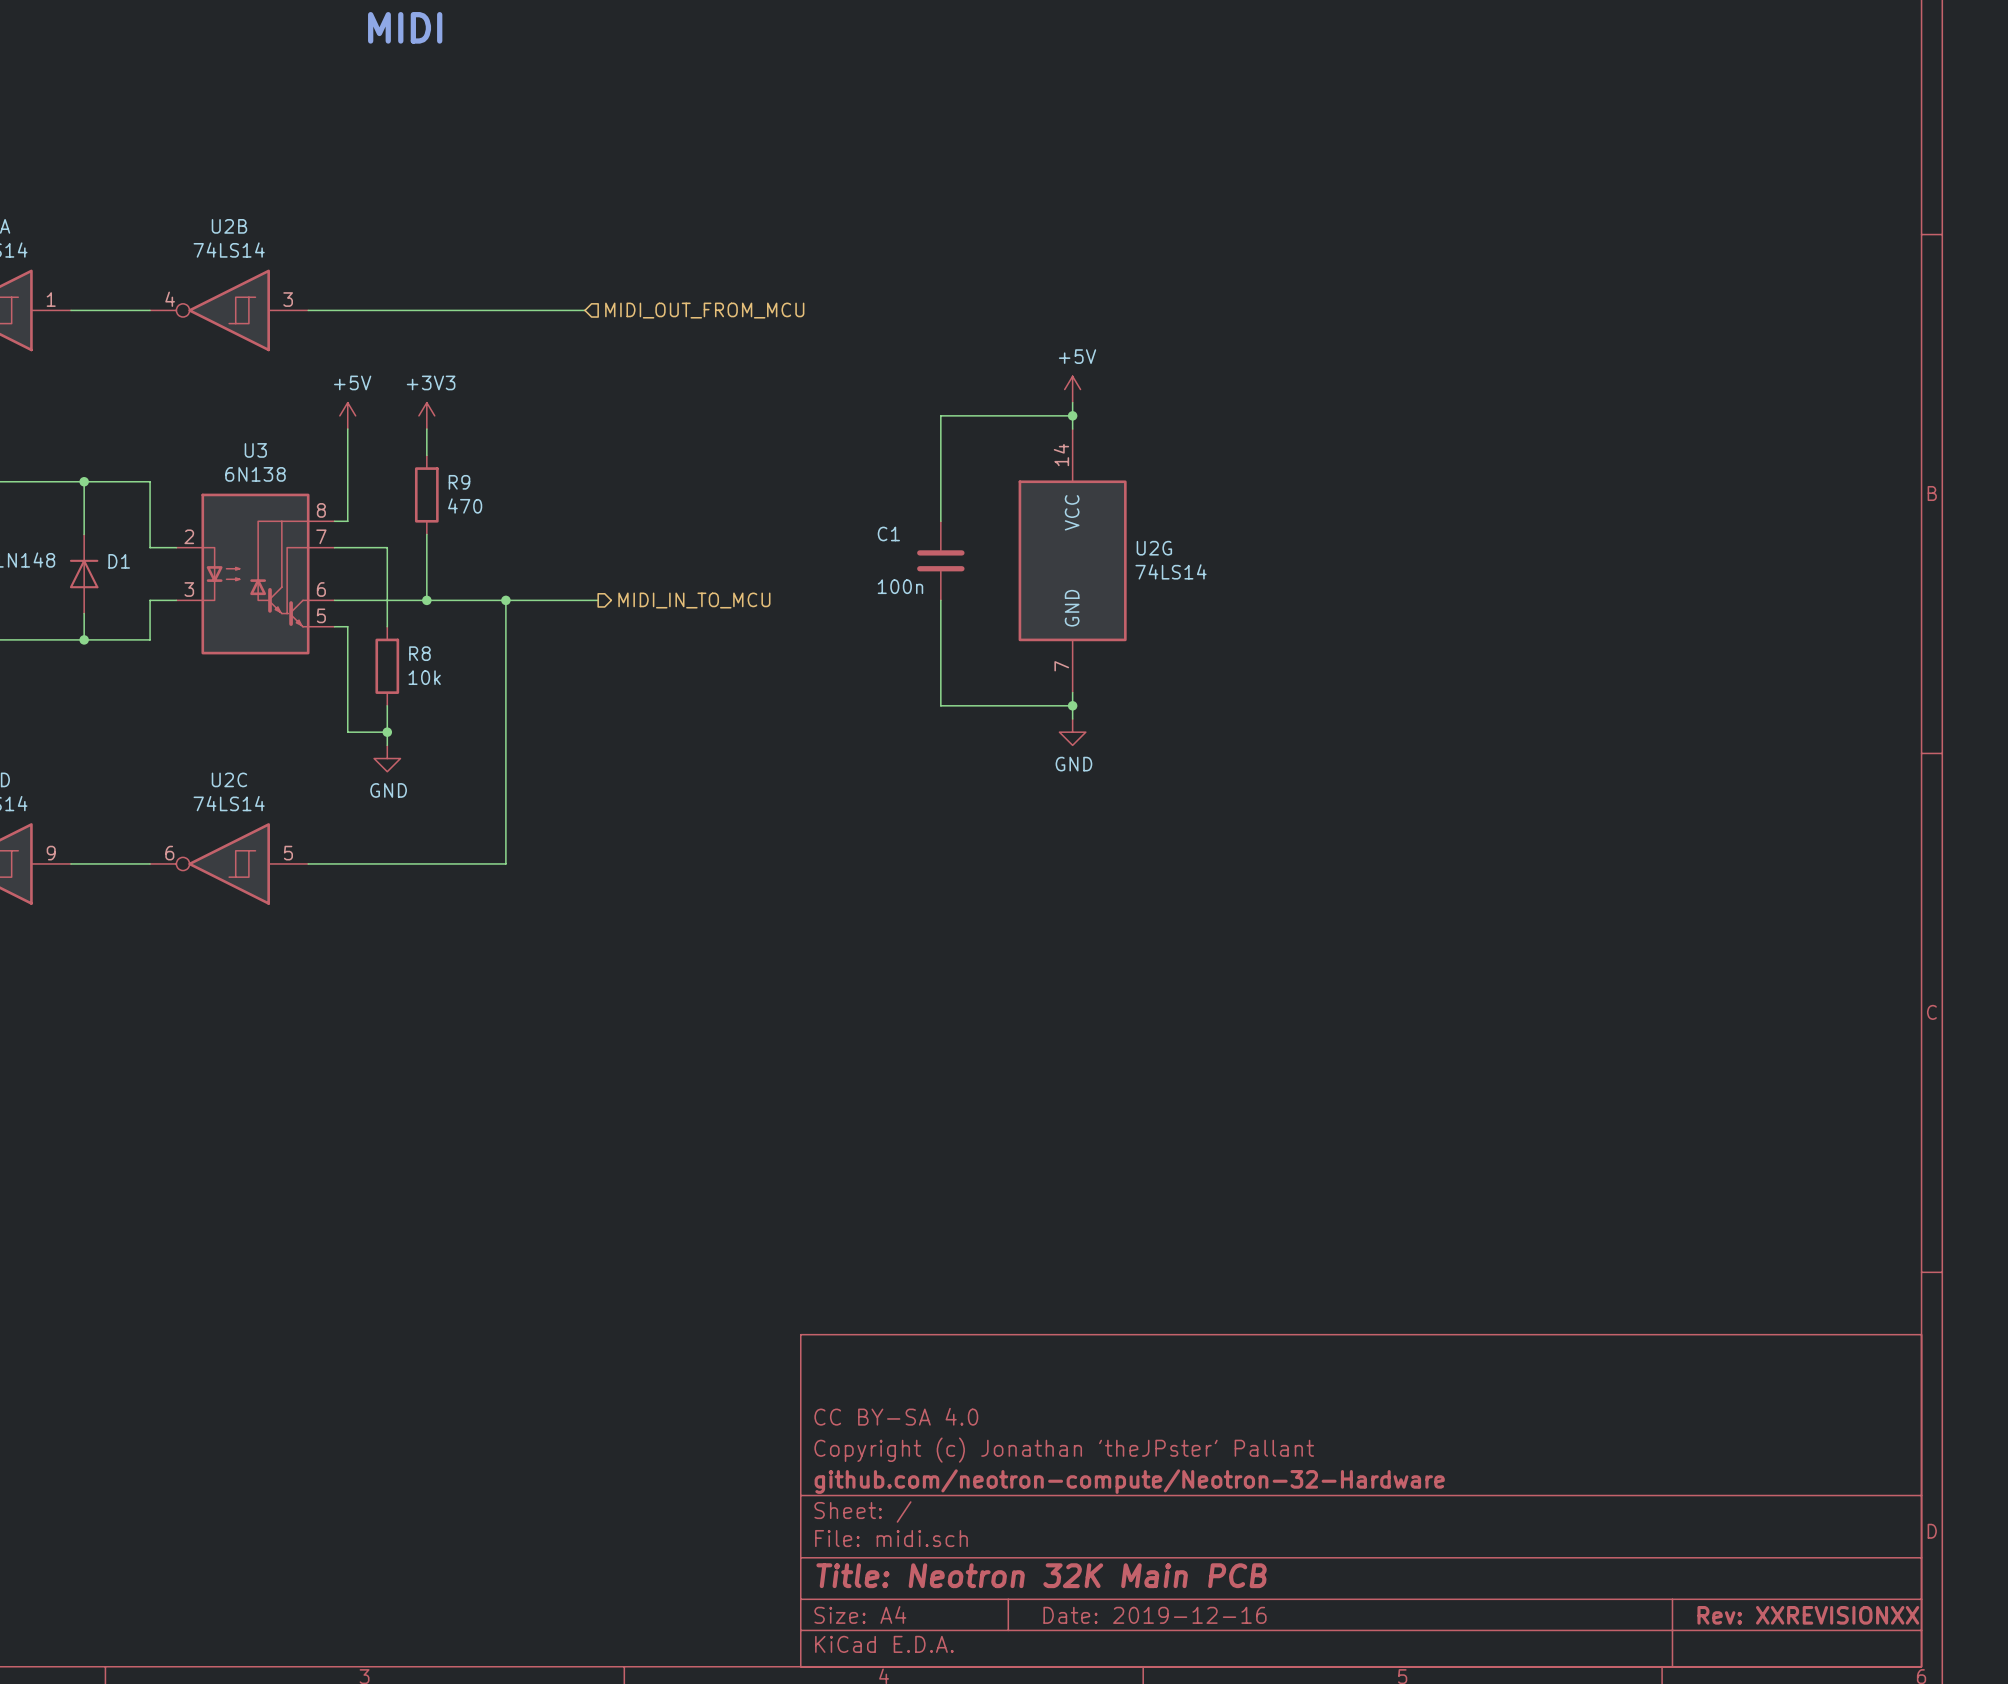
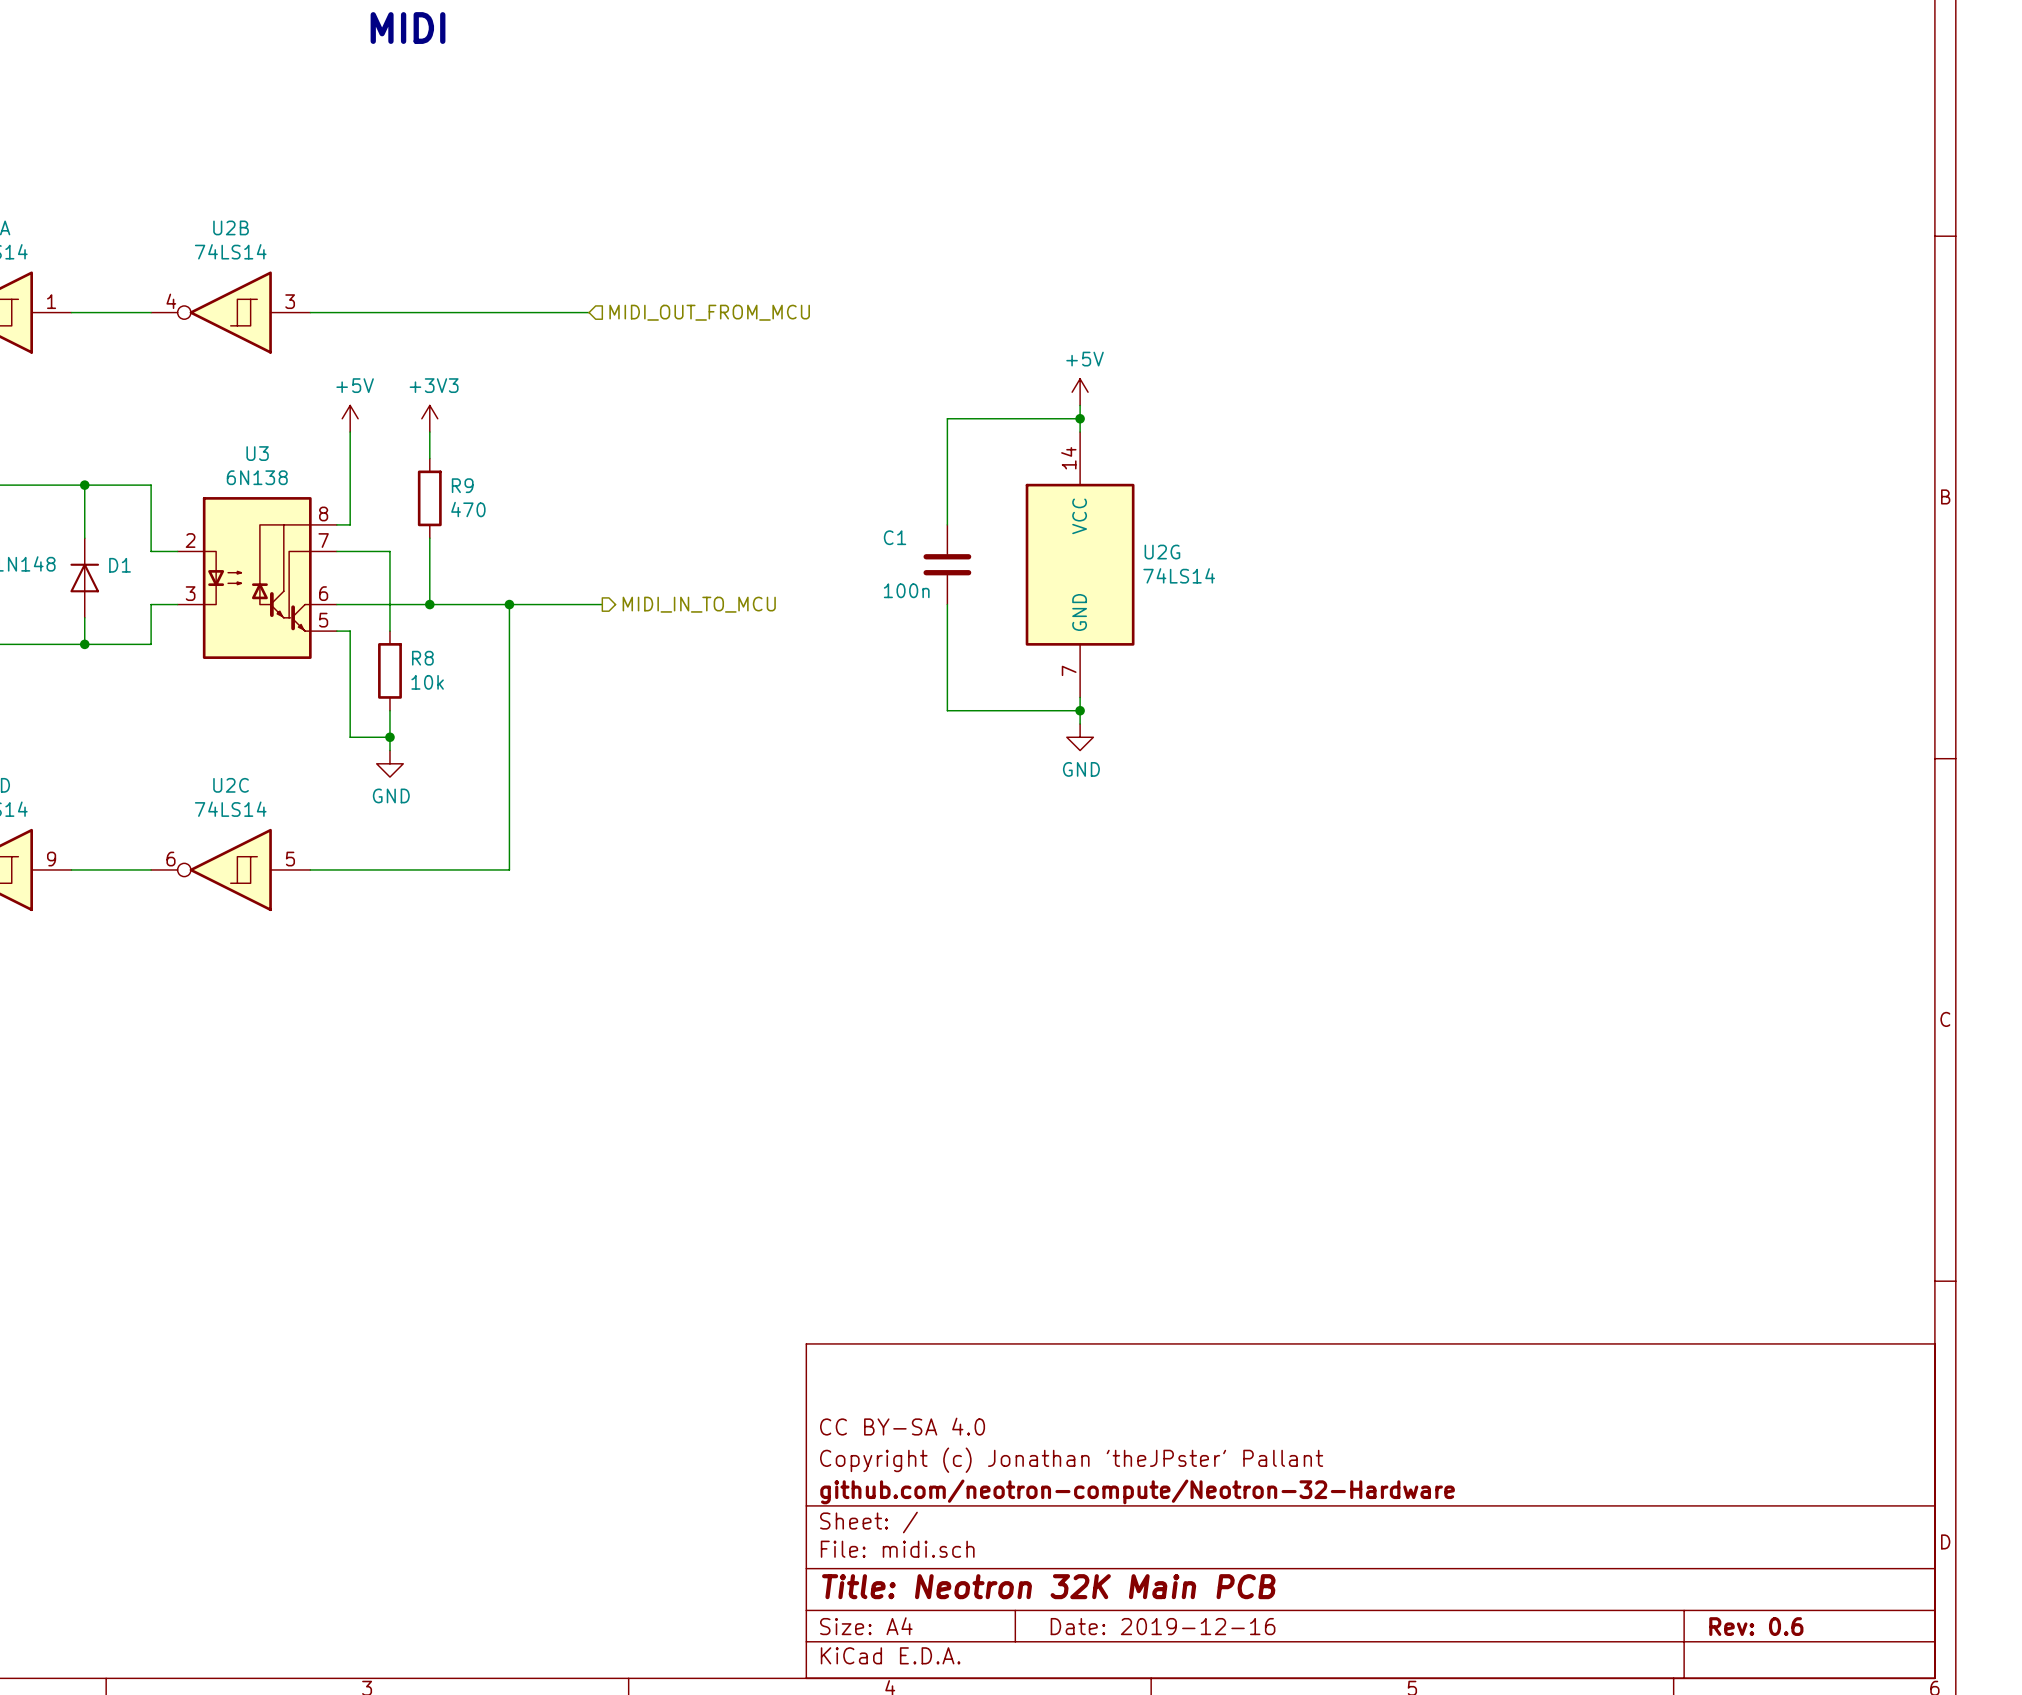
title block: Rev: XXREVISIONXX (1808, 1615) -> Rev: 0.6 (1756, 1626)

